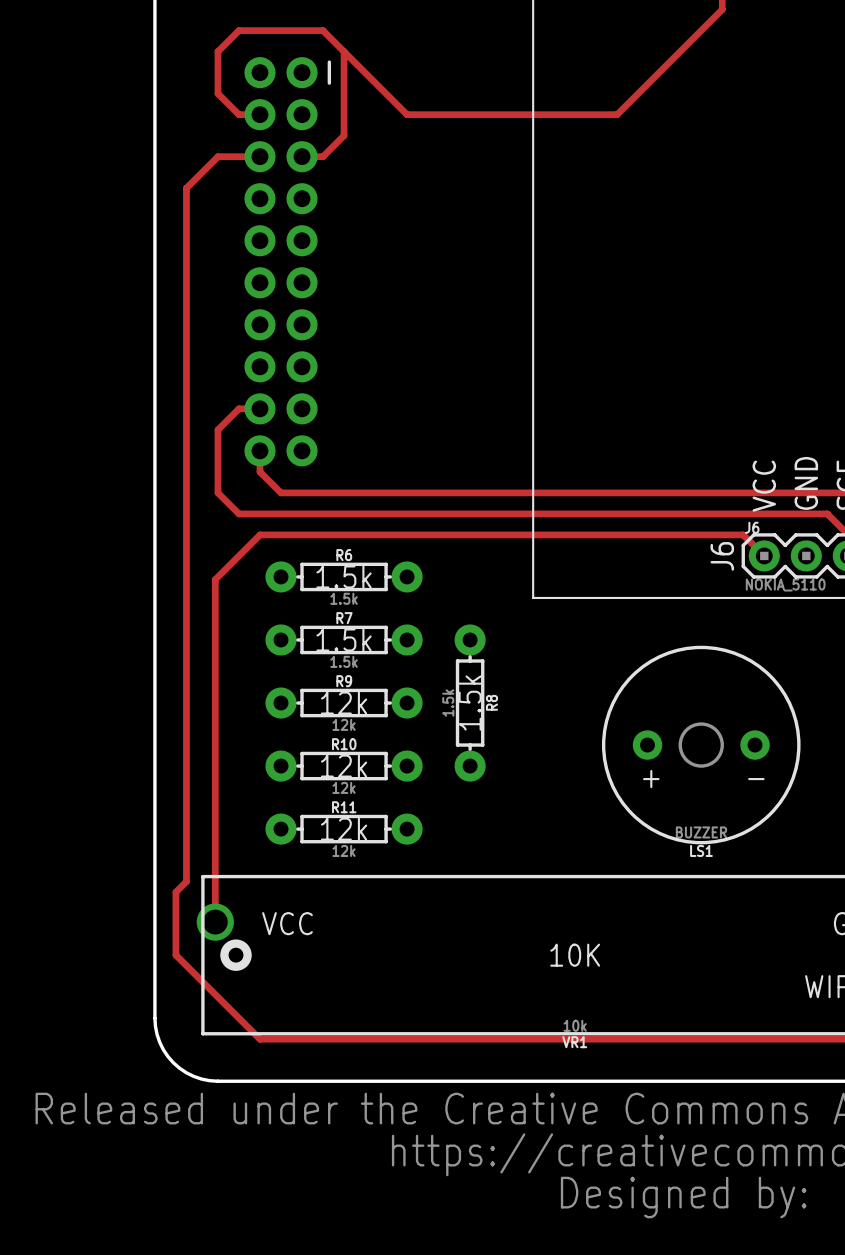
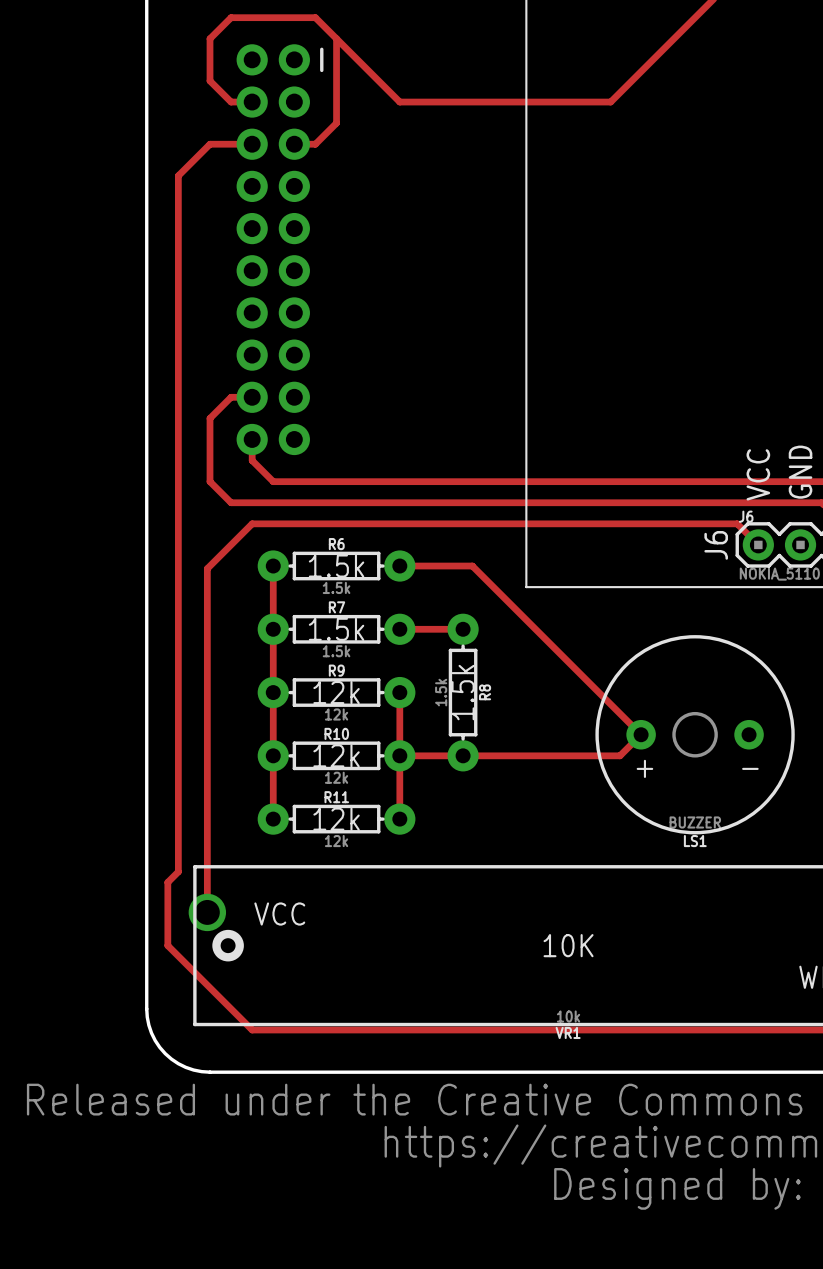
track: none -> (273, 566) (273, 819)
track: none -> (399, 566) (472, 566) (641, 734) (620, 755) (399, 755)
track: none -> (399, 629) (463, 629)
track: none -> (399, 692) (399, 819)

